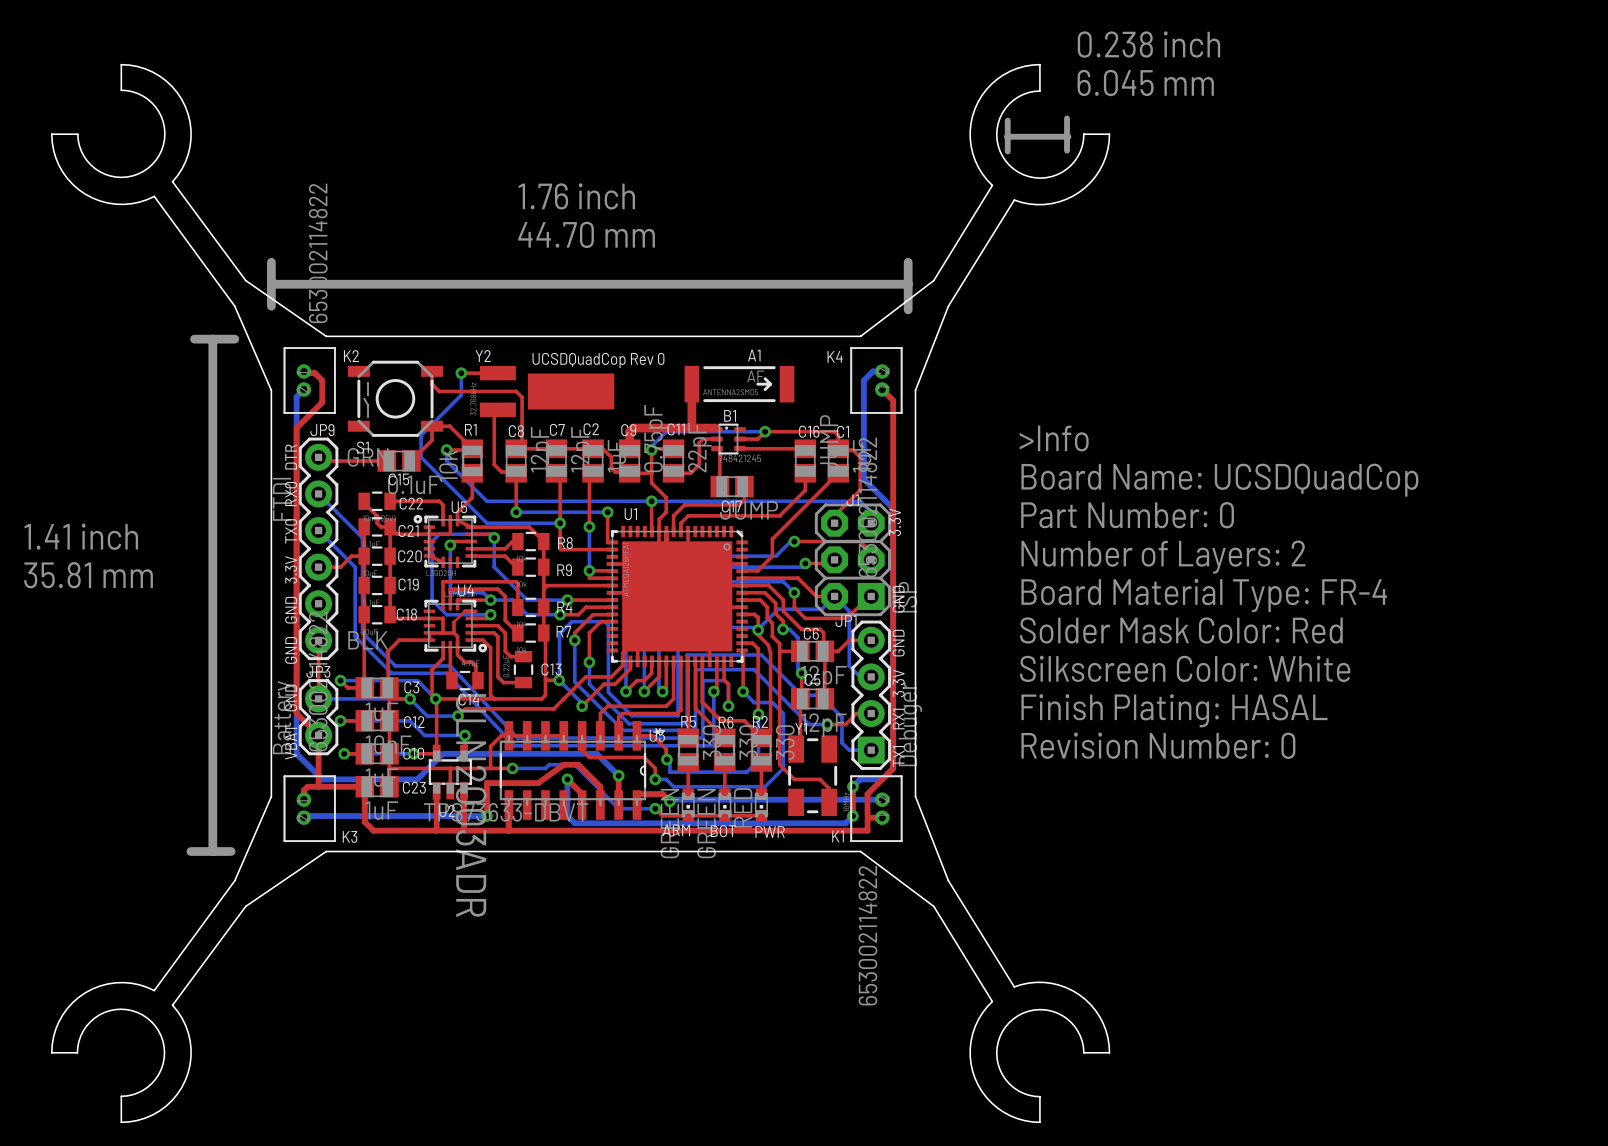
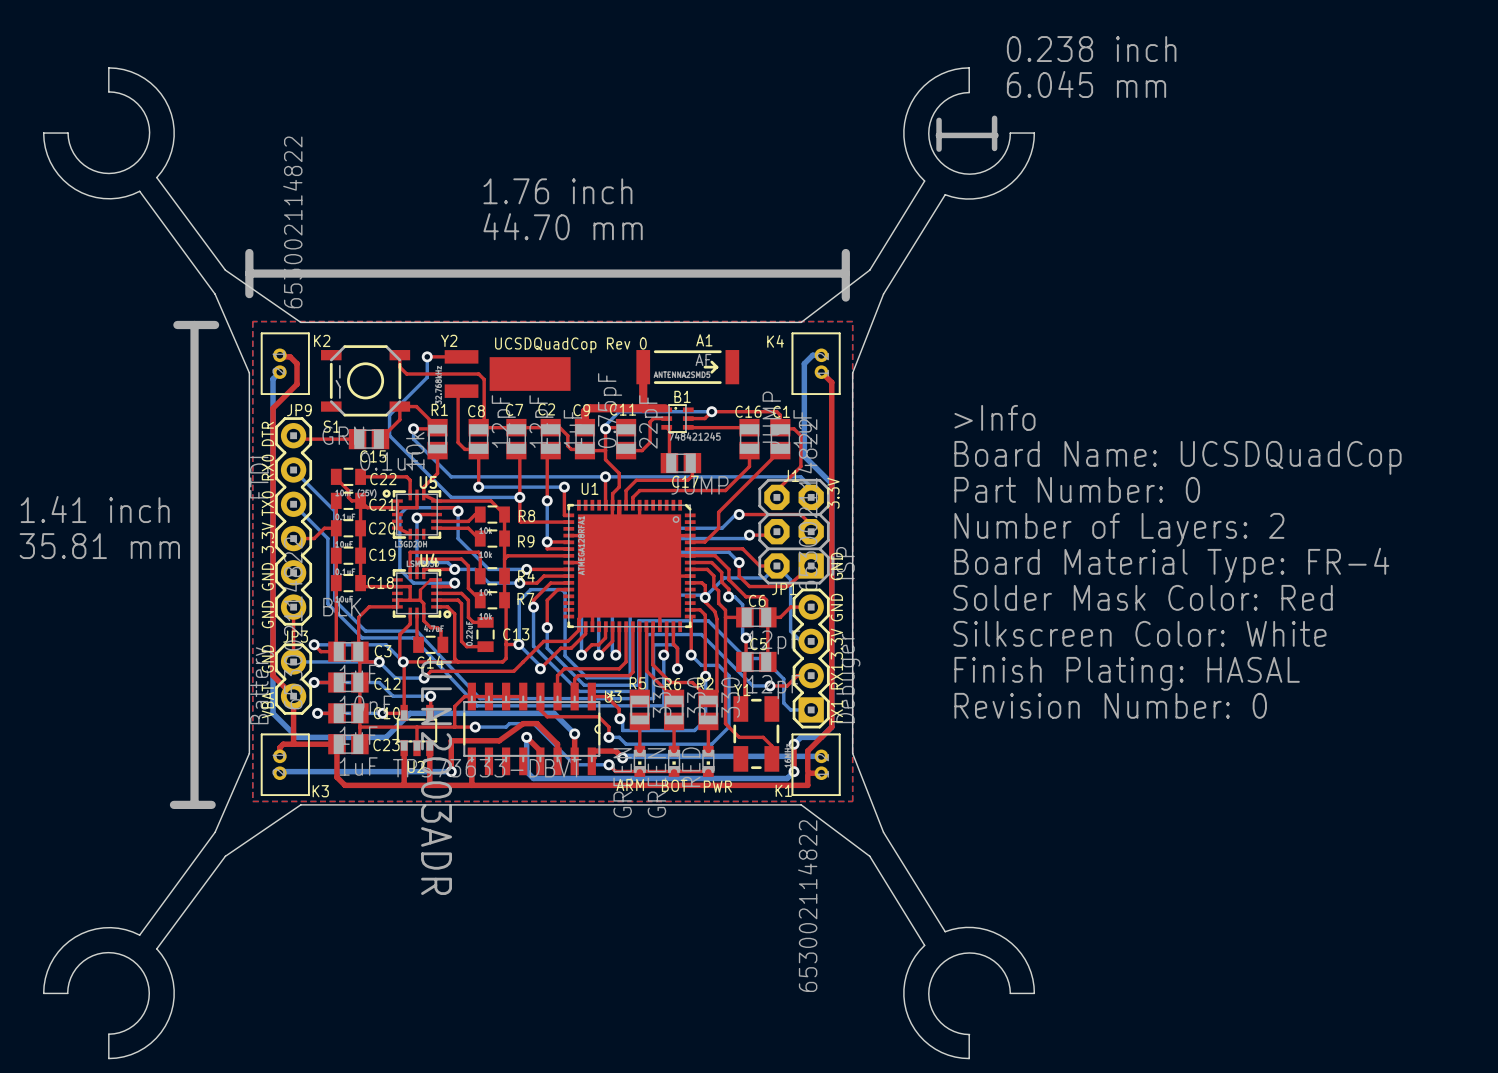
top zone outline: none -> (252, 321) (252, 801) (852, 801) (852, 321) (252, 321)

